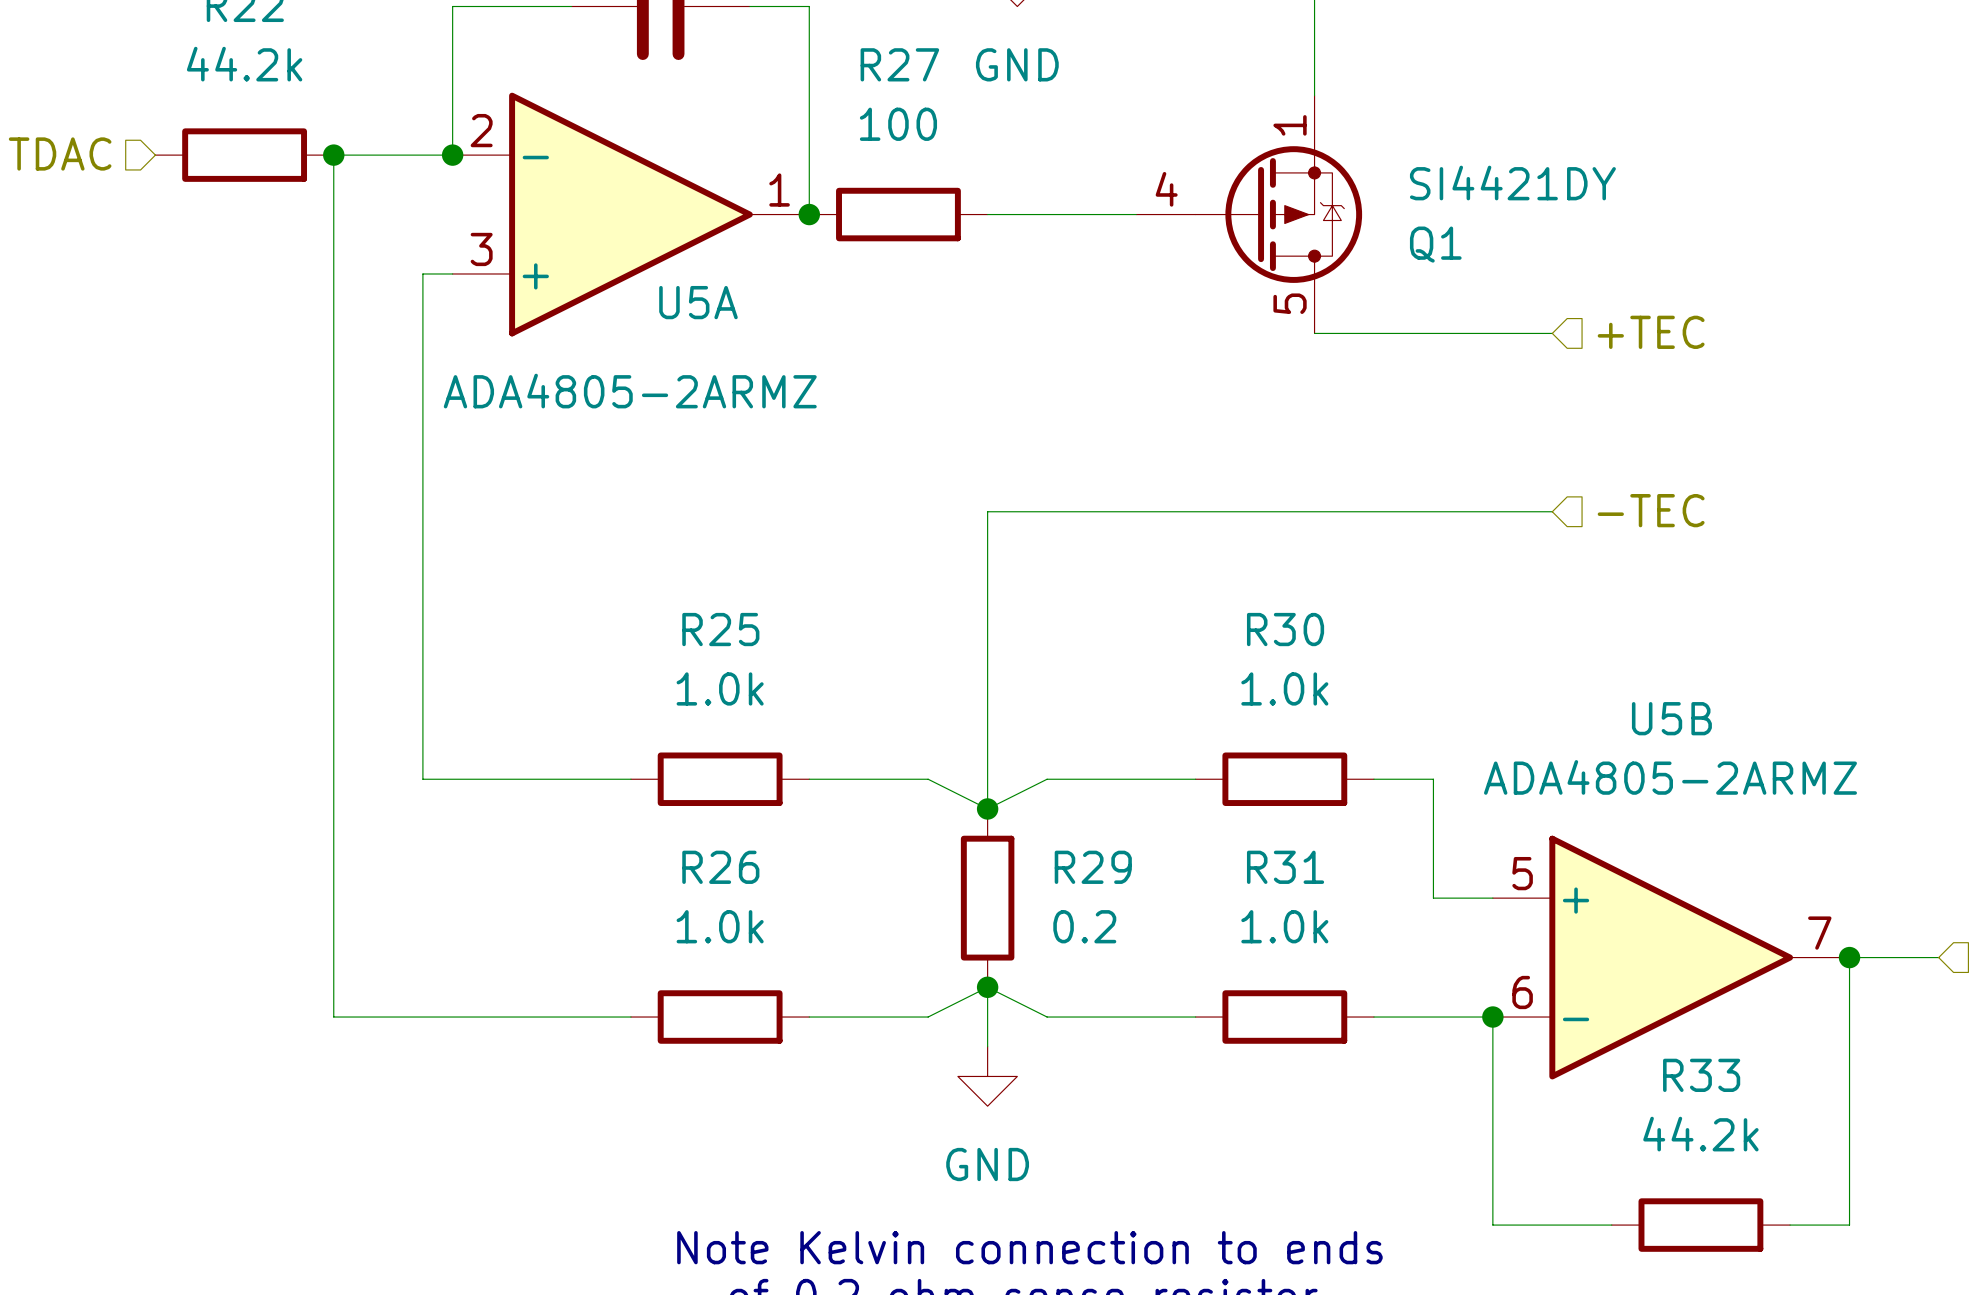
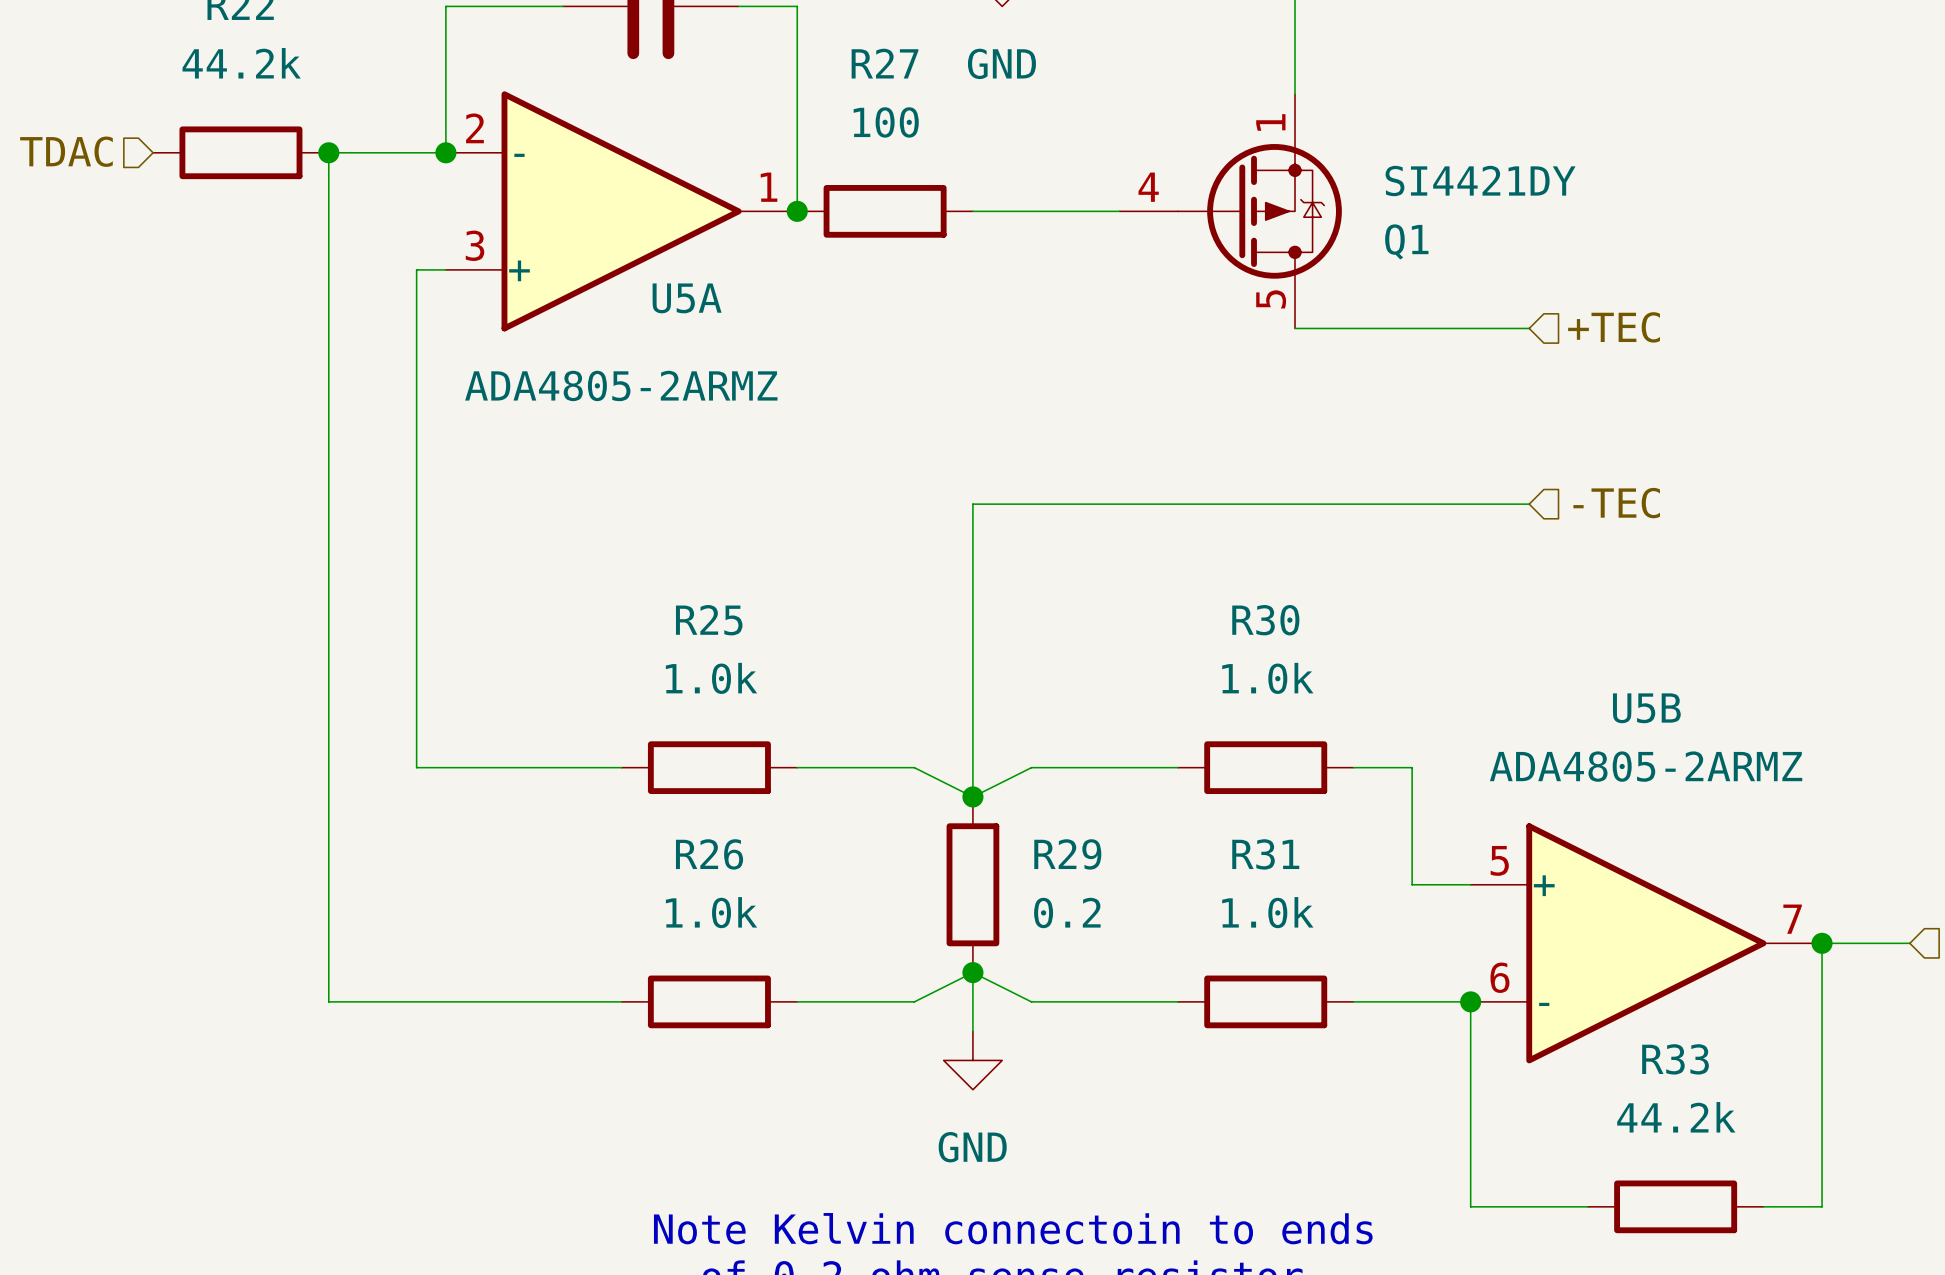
text: Note Kelvin connection to ends (1029, 1247) -> Note Kelvin connectoin to ends (1013, 1228)

